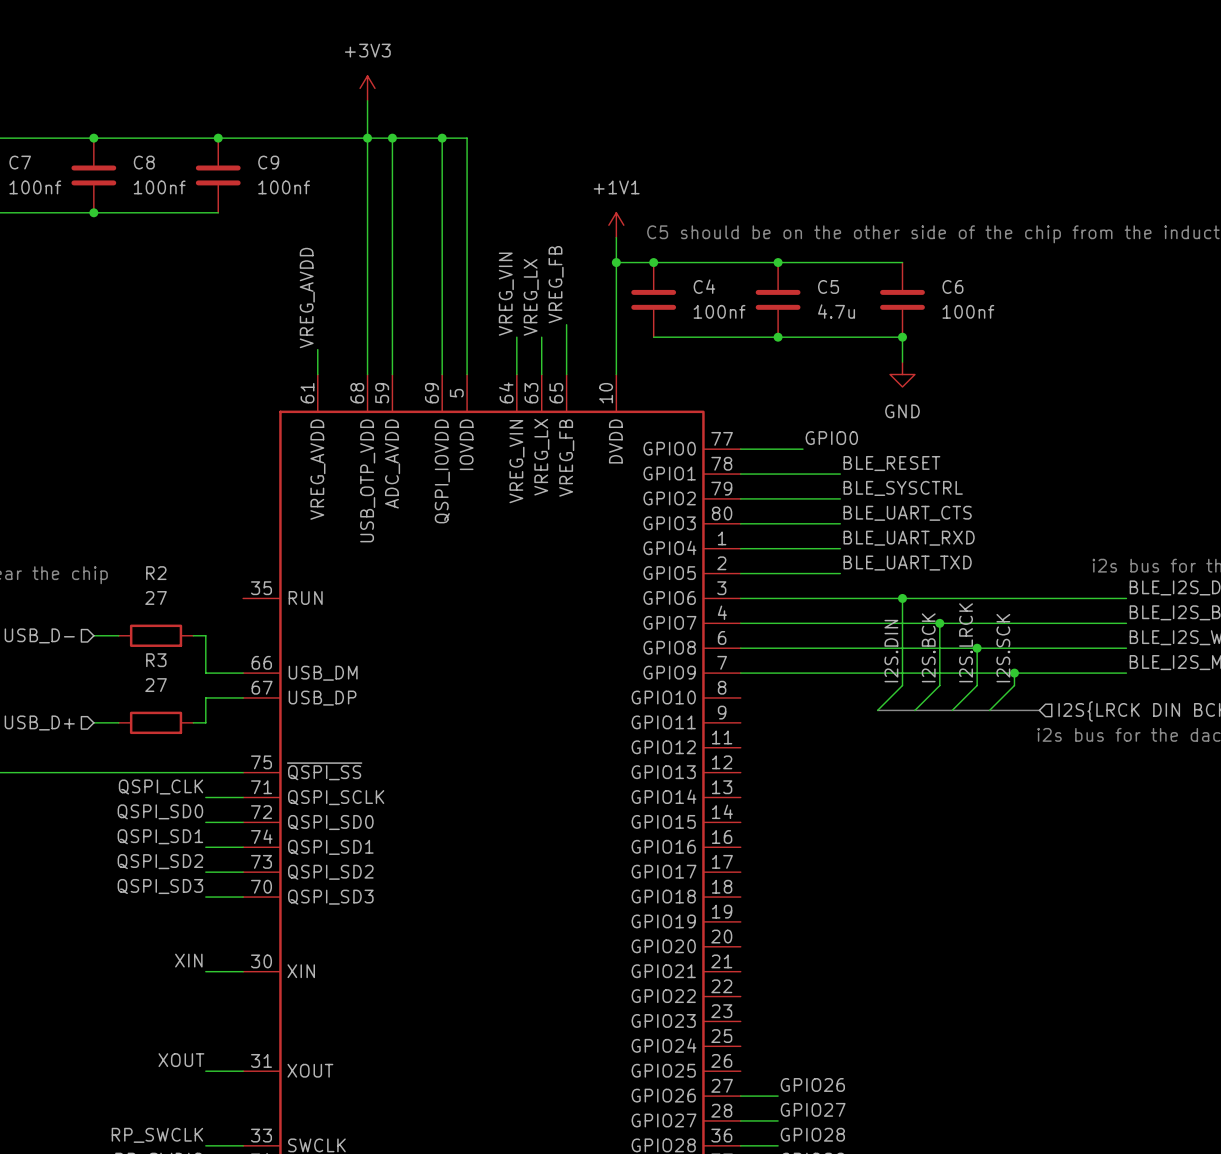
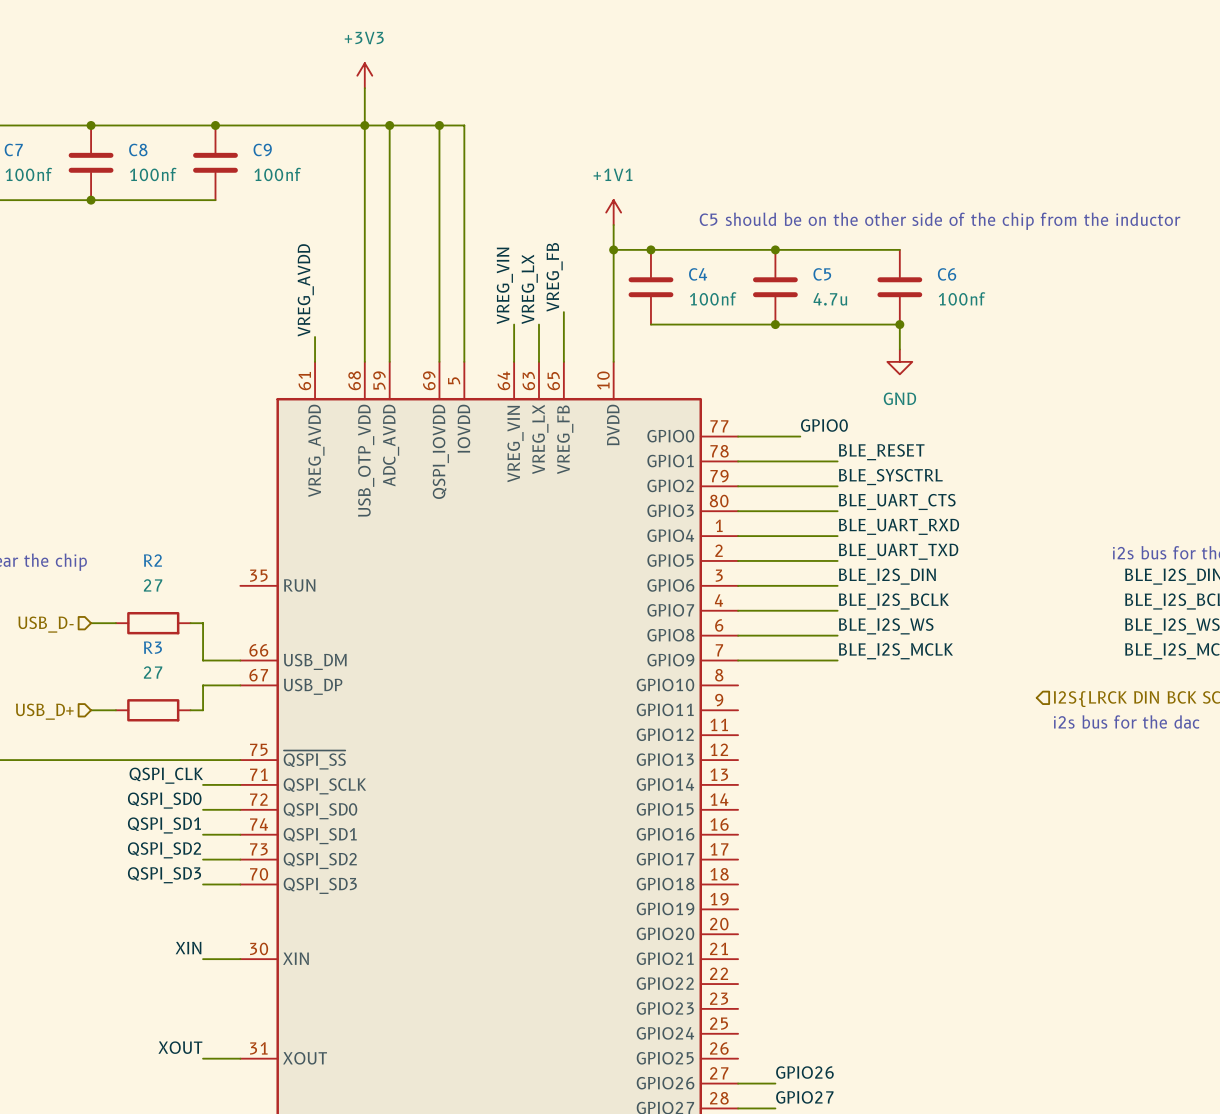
wire: (840, 598) (1126, 598) -> none
wire: (902, 598) (902, 685) (877, 710) -> none
junction: (902, 598) -> none
wire: (840, 623) (1126, 623) -> none
wire: (939, 623) (939, 685) (914, 710) -> none
junction: (939, 623) -> none
label: none -> BLE_I2S_WS (886, 626)
label: I2S.LRCK (966, 642) -> none
label: I2S.BCK (928, 647) -> BLE_I2S_BCLK (893, 601)
wire: (840, 648) (1126, 648) -> none
wire: (977, 648) (977, 685) (952, 710) -> none
junction: (977, 648) -> none
label: I2S.SCK (1003, 648) -> none
label: I2S.DIN (891, 651) -> BLE_I2S_DIN (887, 576)
label: none -> BLE_I2S_MCLK (895, 651)
wire: (840, 673) (1126, 673) -> none
wire: (1014, 673) (1014, 685) (989, 710) -> none
junction: (1014, 673) -> none
bus: (877, 710) (1039, 710) -> none

